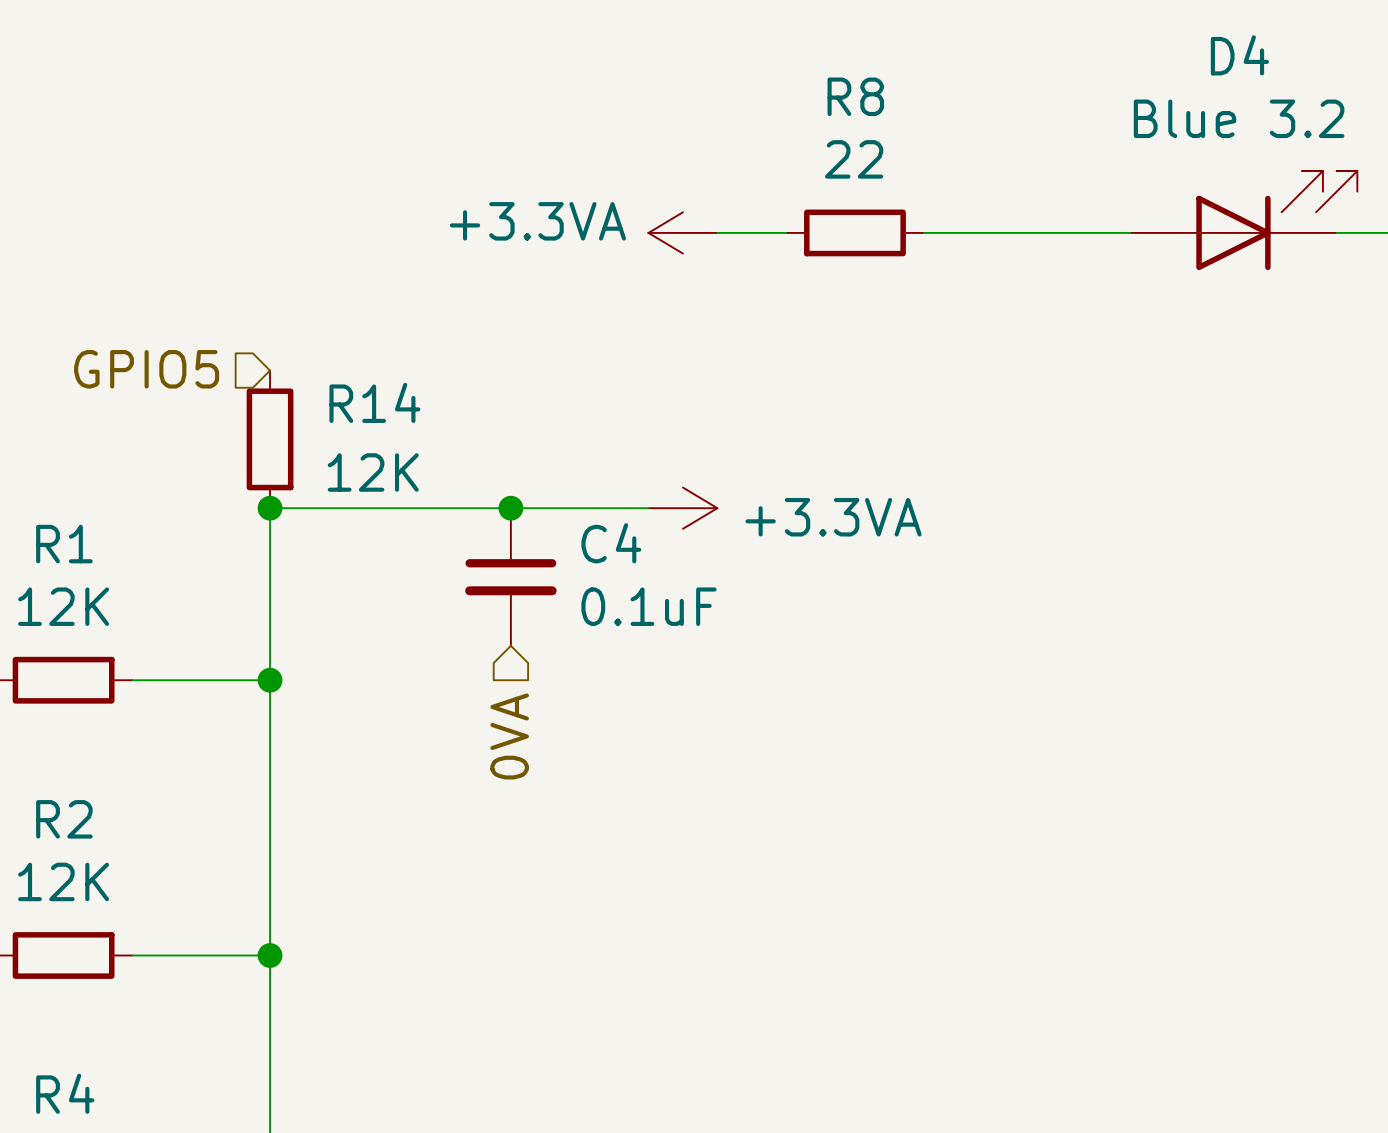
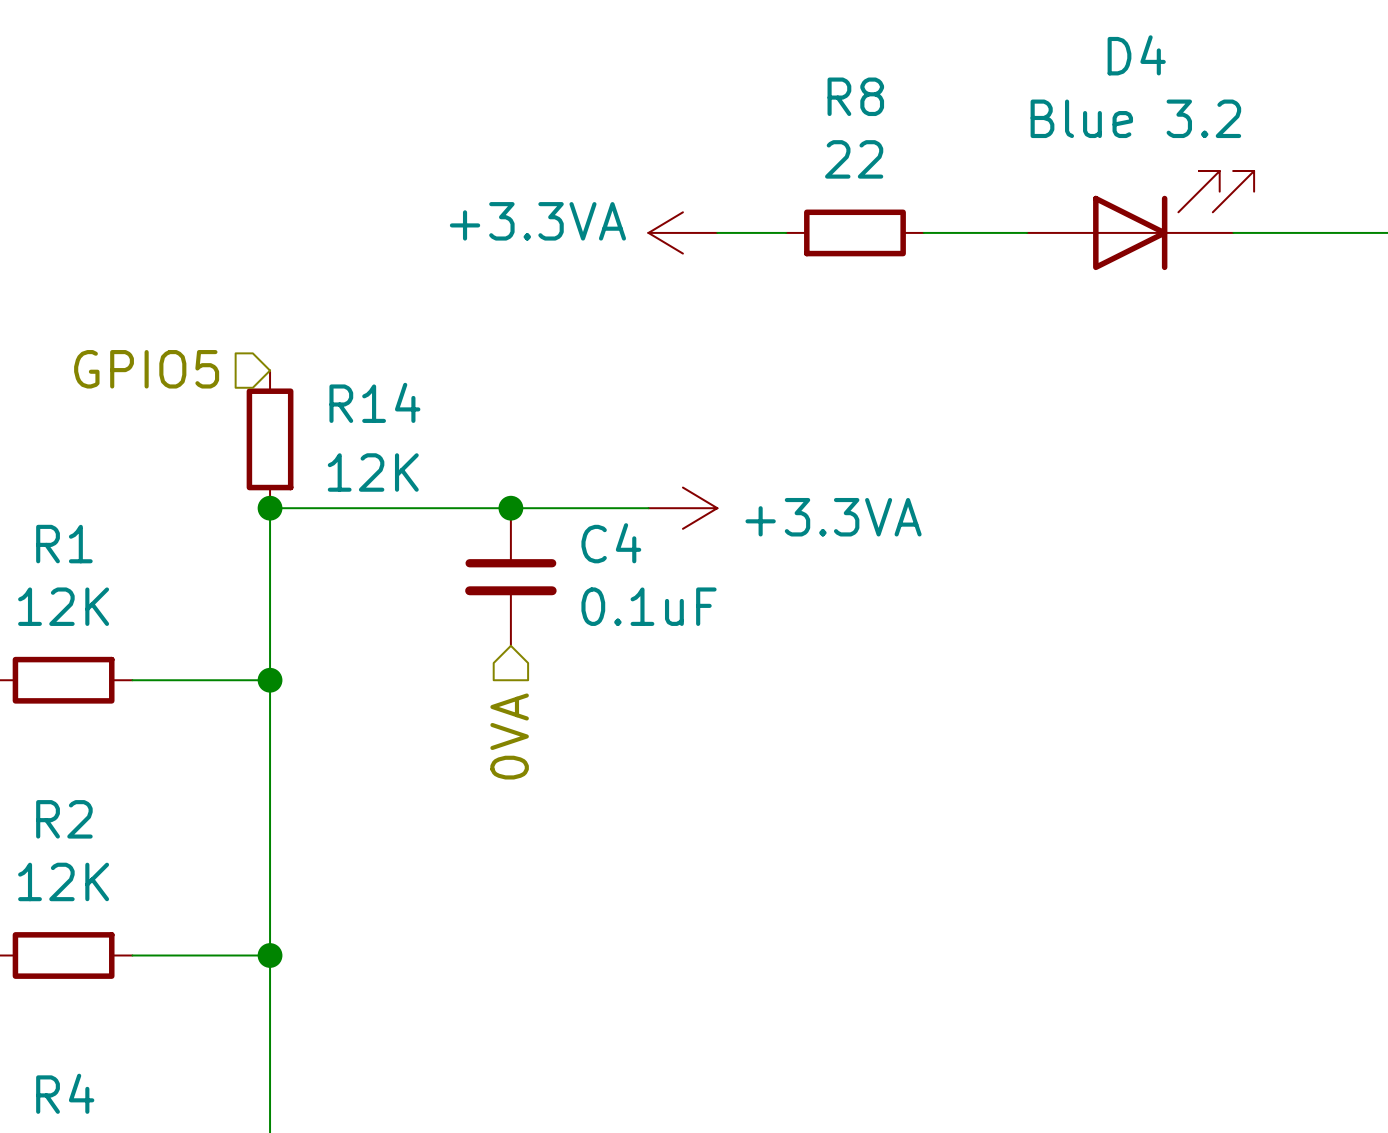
D4 position: (1243, 220) -> (1140, 220)

